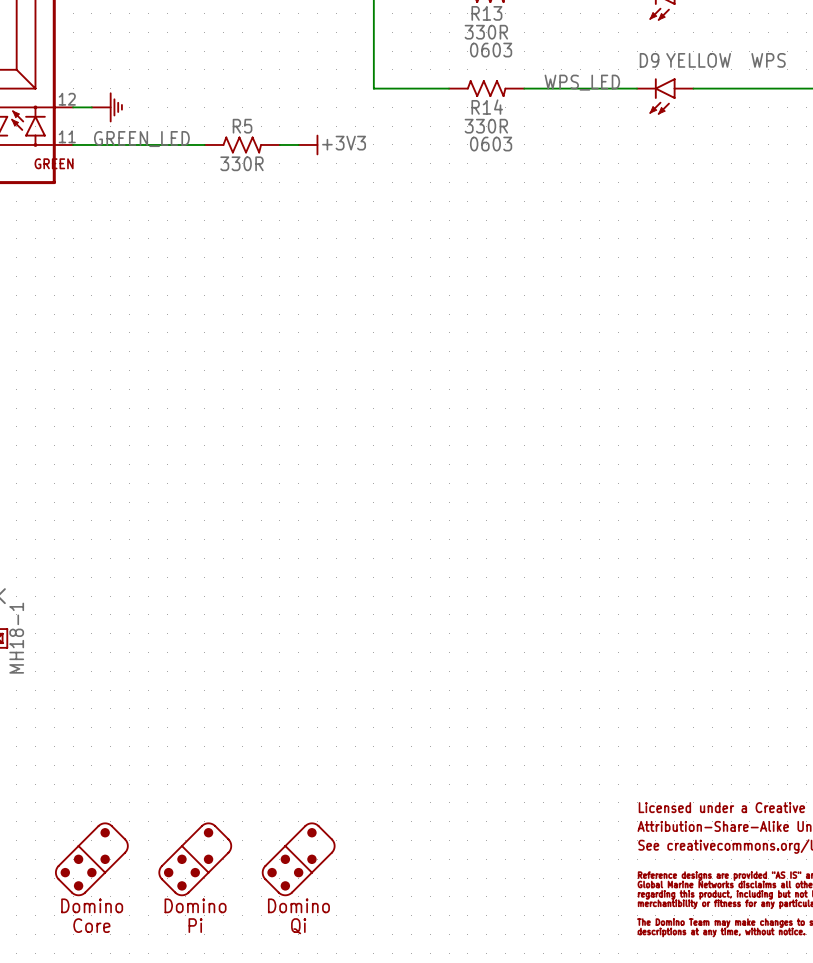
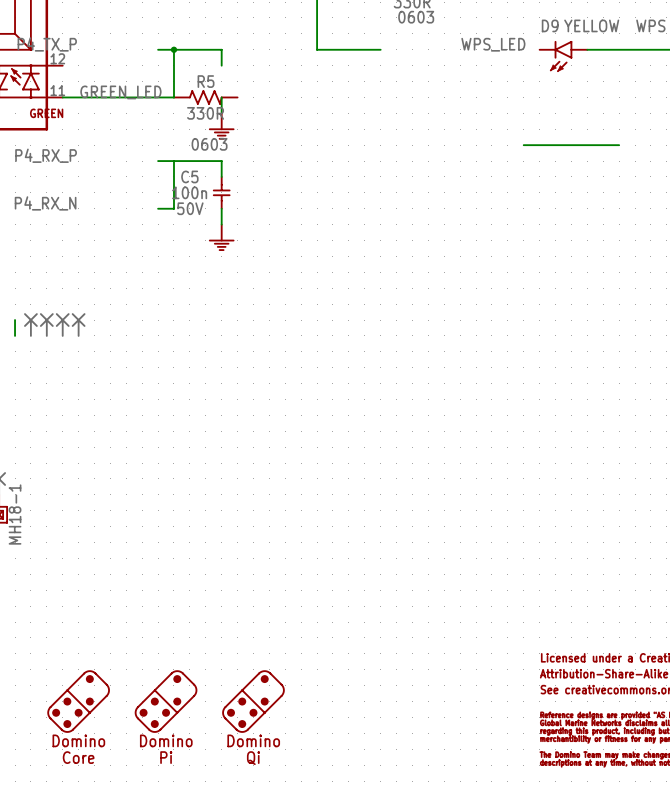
label: none -> P4_TX_P (47, 44)
wire: none -> (158, 49) (221, 49) (221, 65)
wire: none -> (173, 49) (173, 97)
junction: none -> (173, 49)
R14: 330R (486, 88) -> none
wire: (524, 88) (637, 88) -> (523, 145) (619, 145)
wire: (73, 107) (91, 107) -> none
power symbol: (107, 107) -> none
wire: none -> (221, 97) (221, 113)
wire: (279, 144) (298, 144) -> none
power symbol: +3V3 (308, 144) -> none
power symbol: none -> (221, 126)
R5 text: none -> 0603 (209, 144)
label: none -> P4_RX_P (46, 155)
wire: none -> (158, 161) (221, 161) (221, 176)
wire: none -> (173, 161) (173, 208) (158, 208)
C5: none -> 100n (221, 192)
label: none -> P4_RX_N (45, 203)
wire: none -> (221, 208) (221, 224)
power symbol: none -> (221, 237)
wire: none -> (15, 320) (15, 335)
part: none -> (30, 324)
part: none -> (46, 324)
part: none -> (62, 324)
part: none -> (78, 324)

